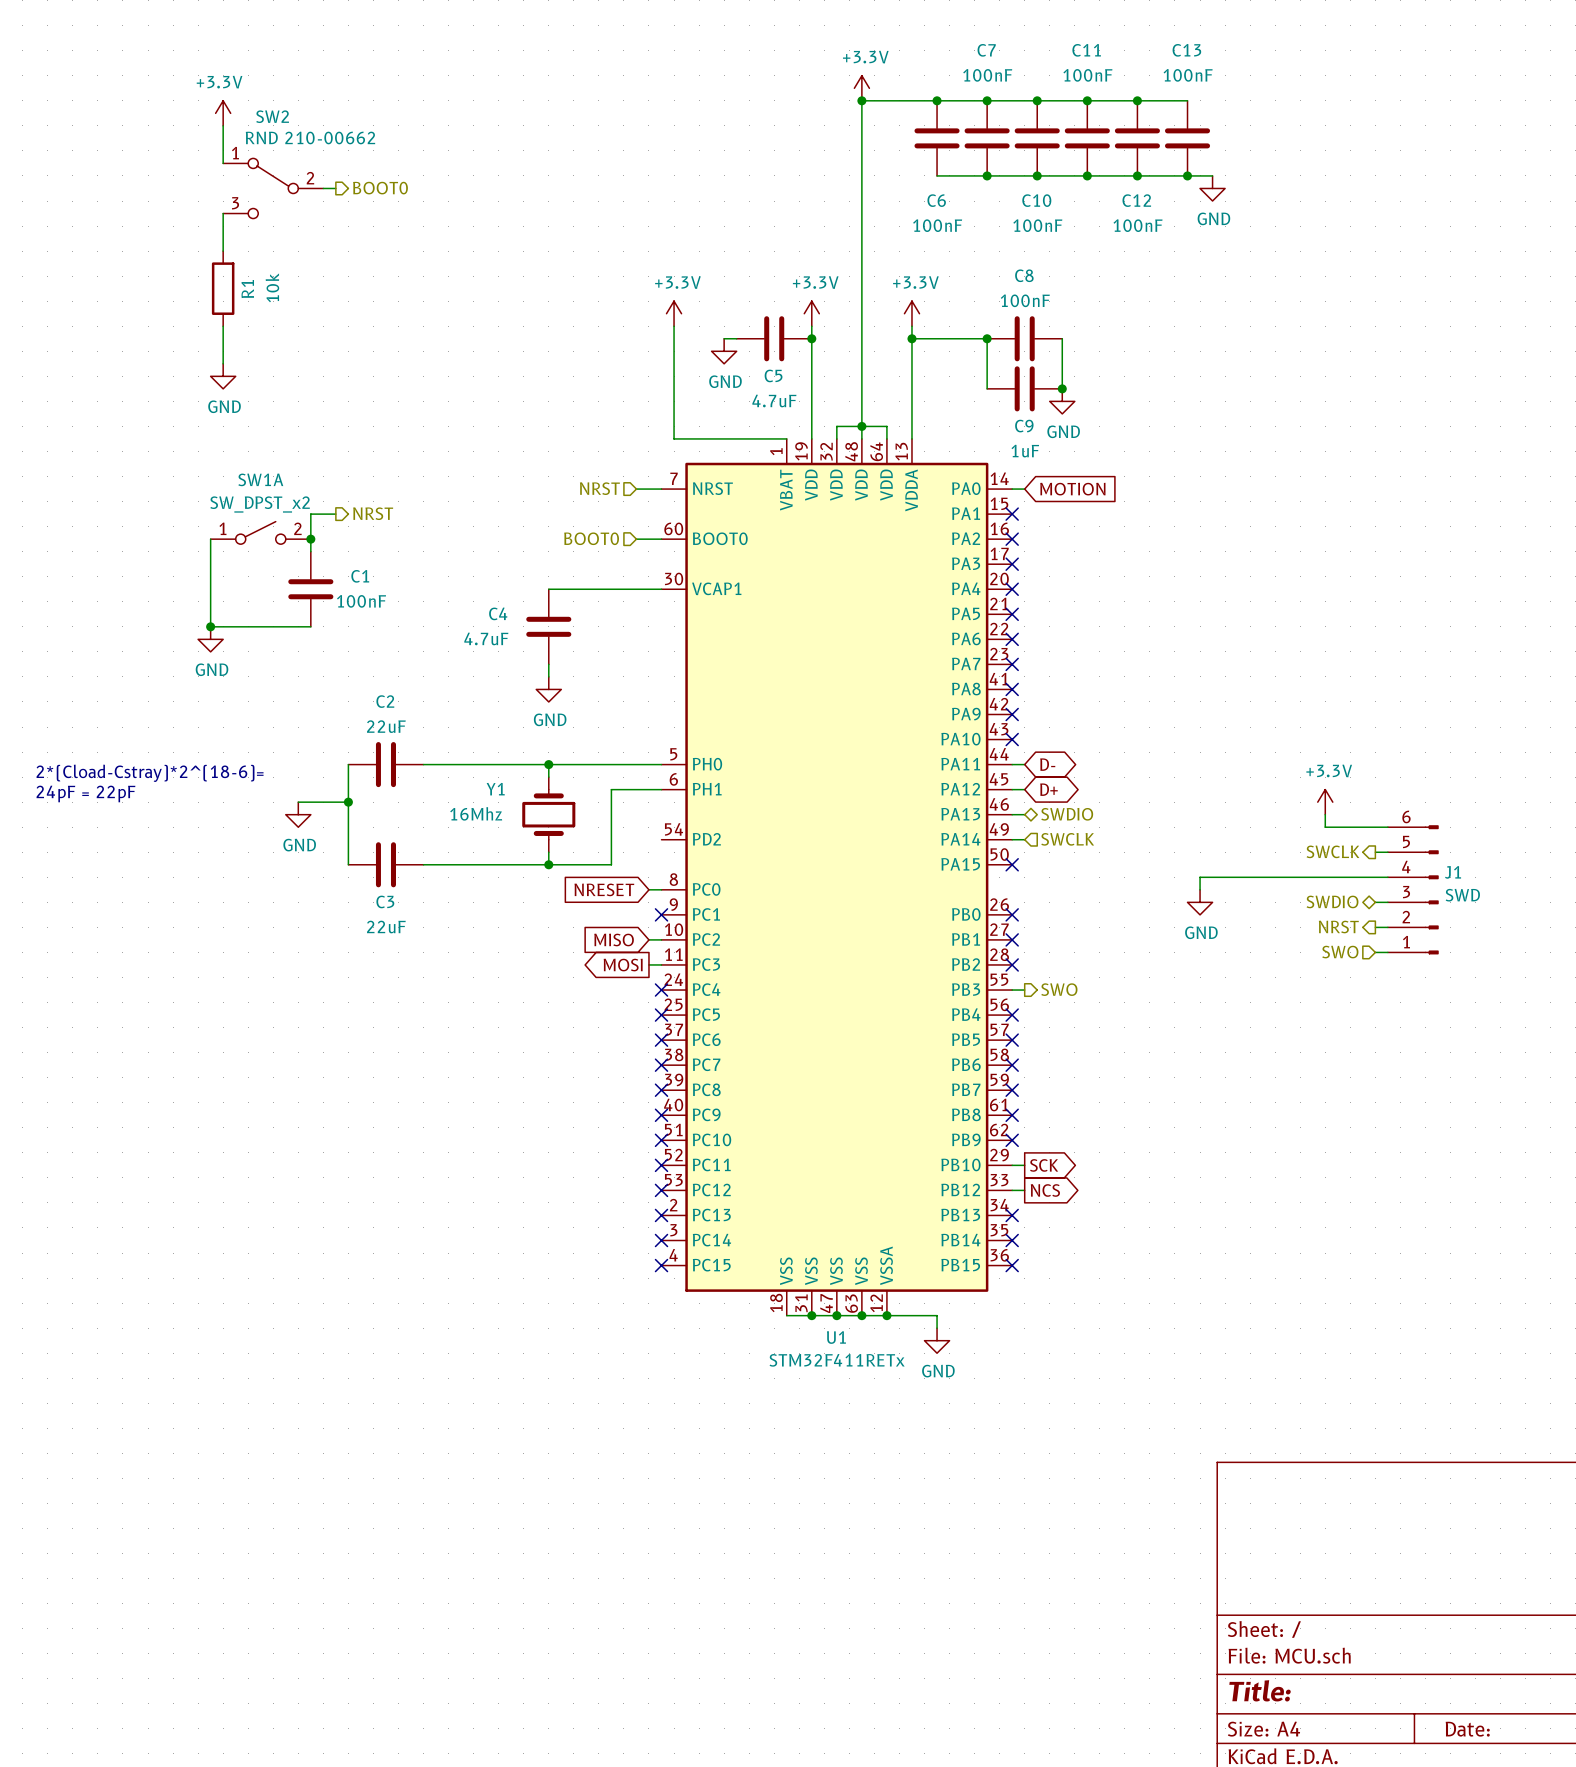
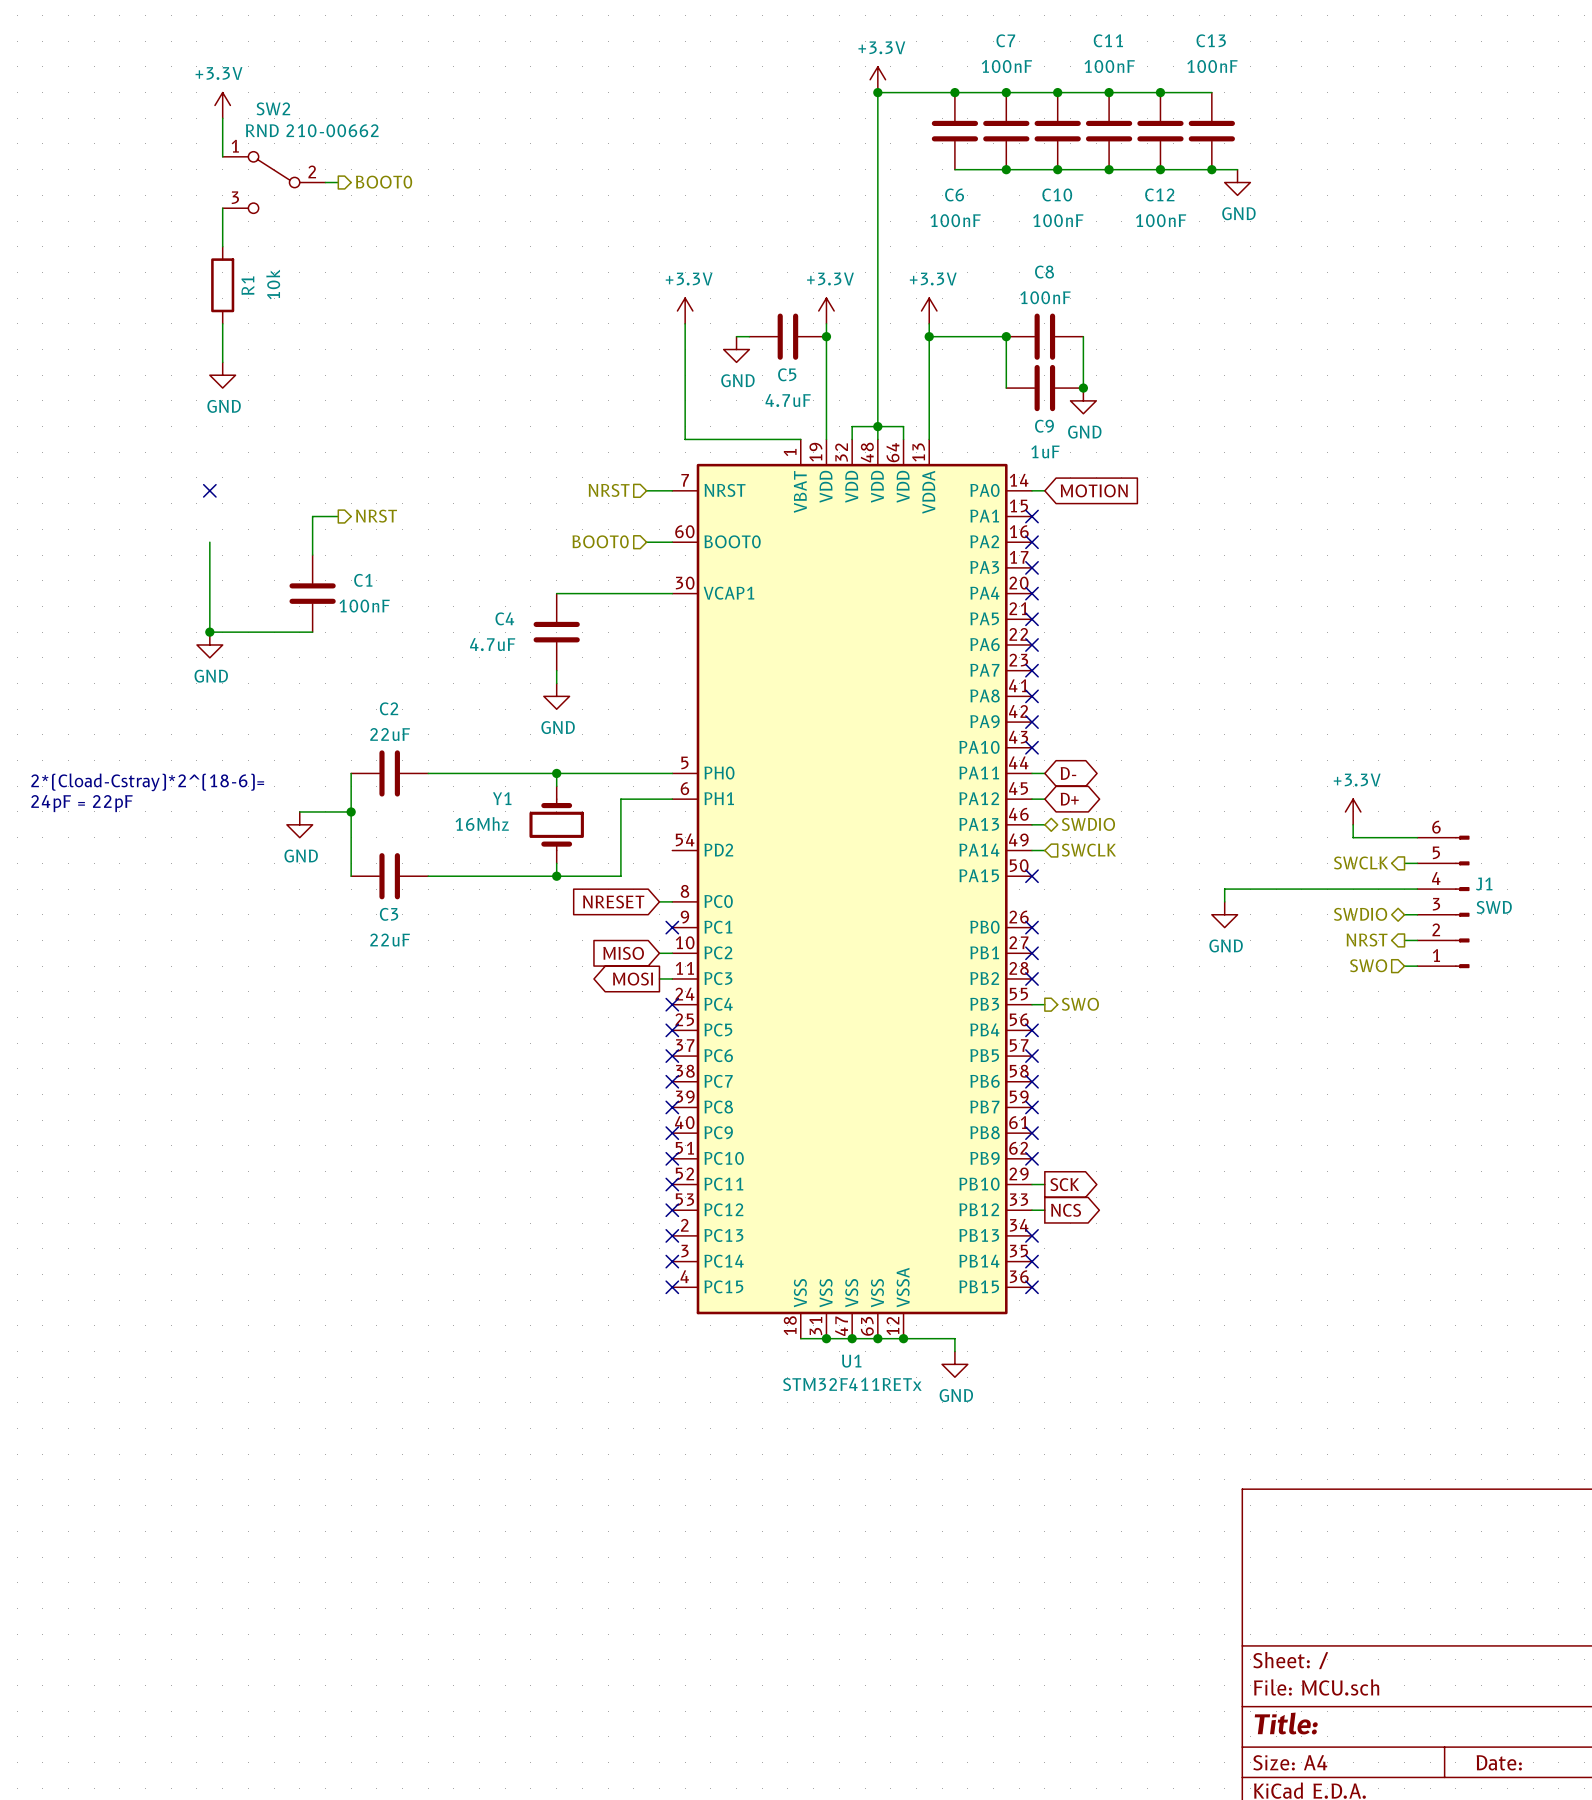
no-connect mark: none -> (209, 490)
SW1A: SW_DPST_x2 (260, 532) -> none
junction: (310, 539) -> none

